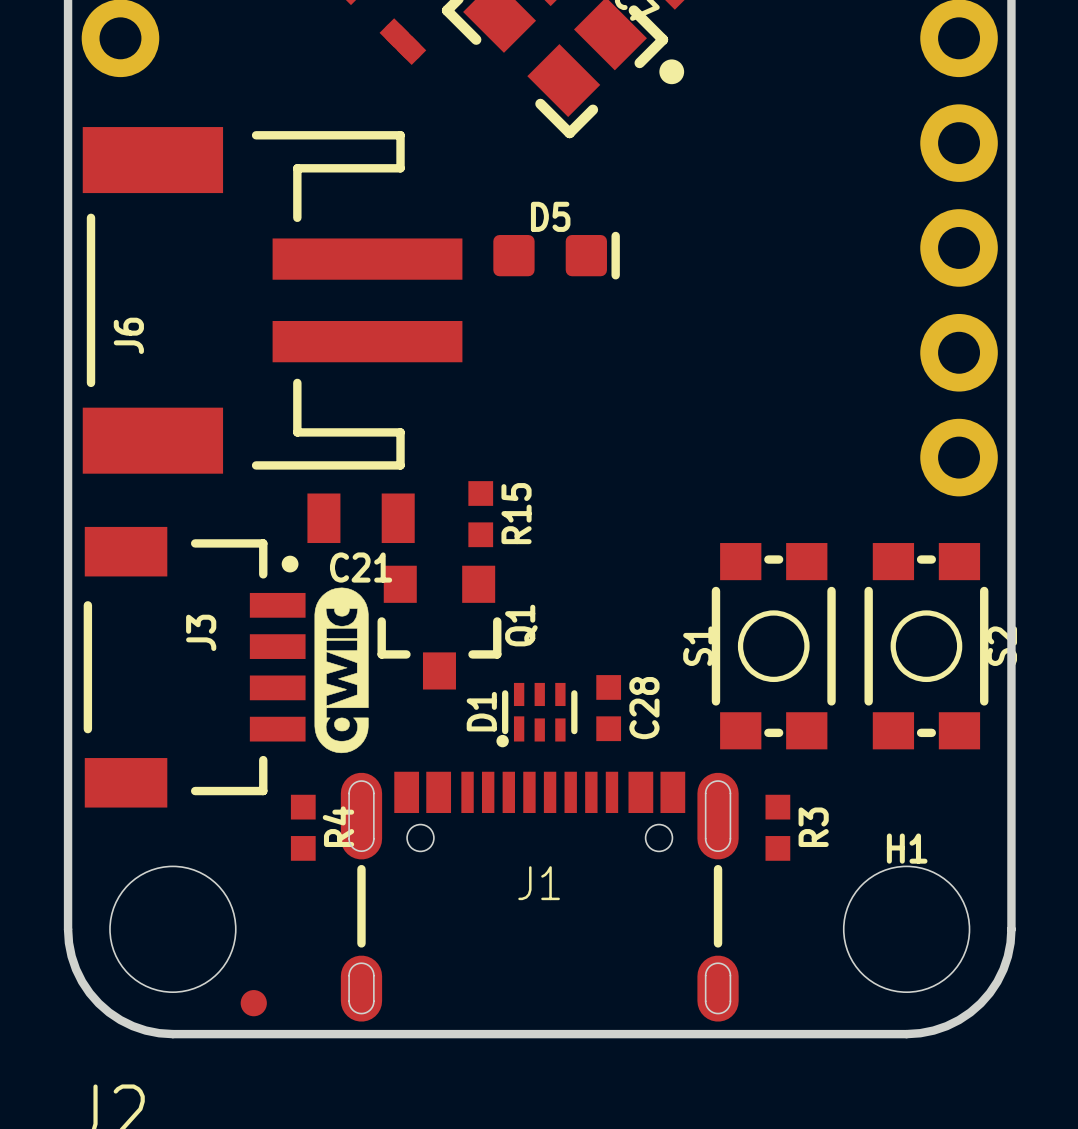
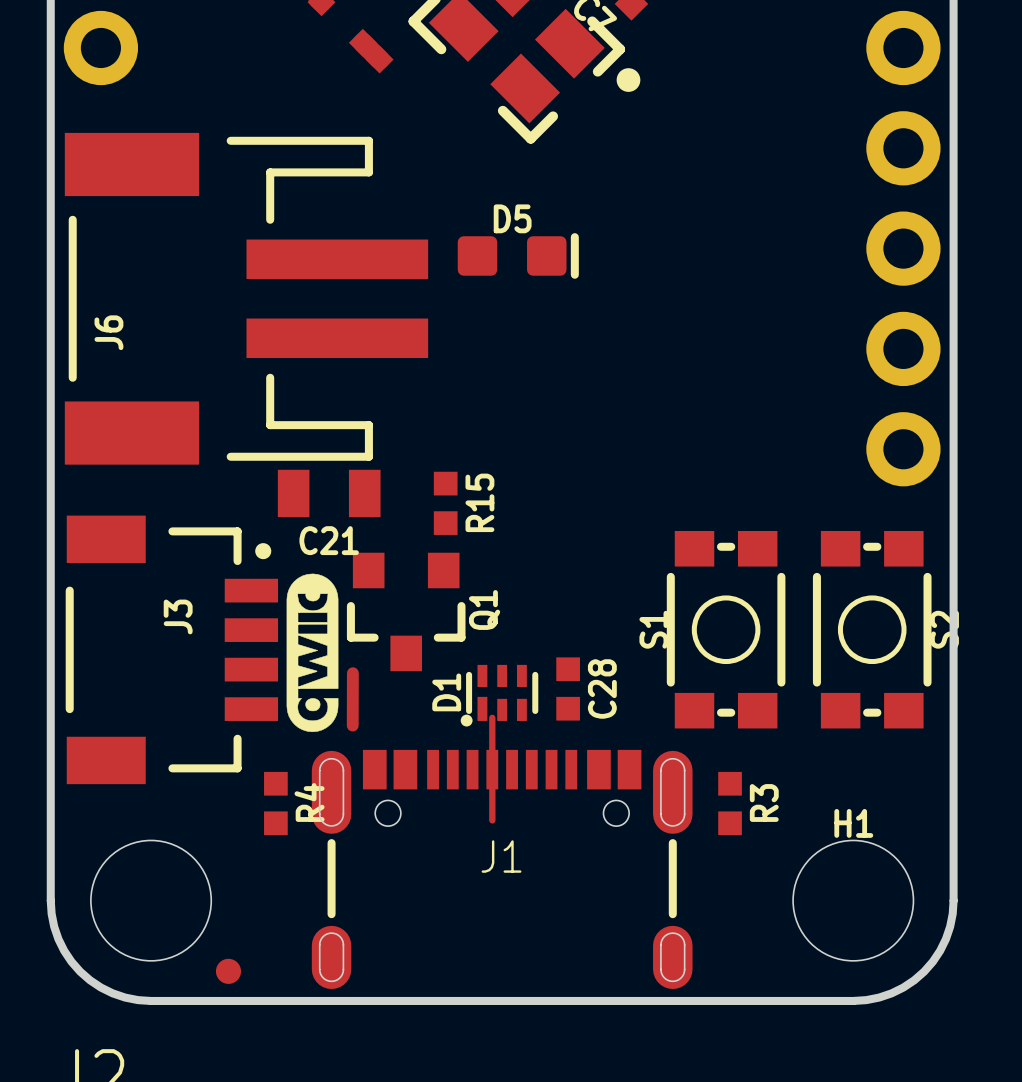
C21 position: (361, 518) -> (329, 493)
track: none -> (352, 673) (352, 725)
track: none -> (492, 717) (492, 820)

